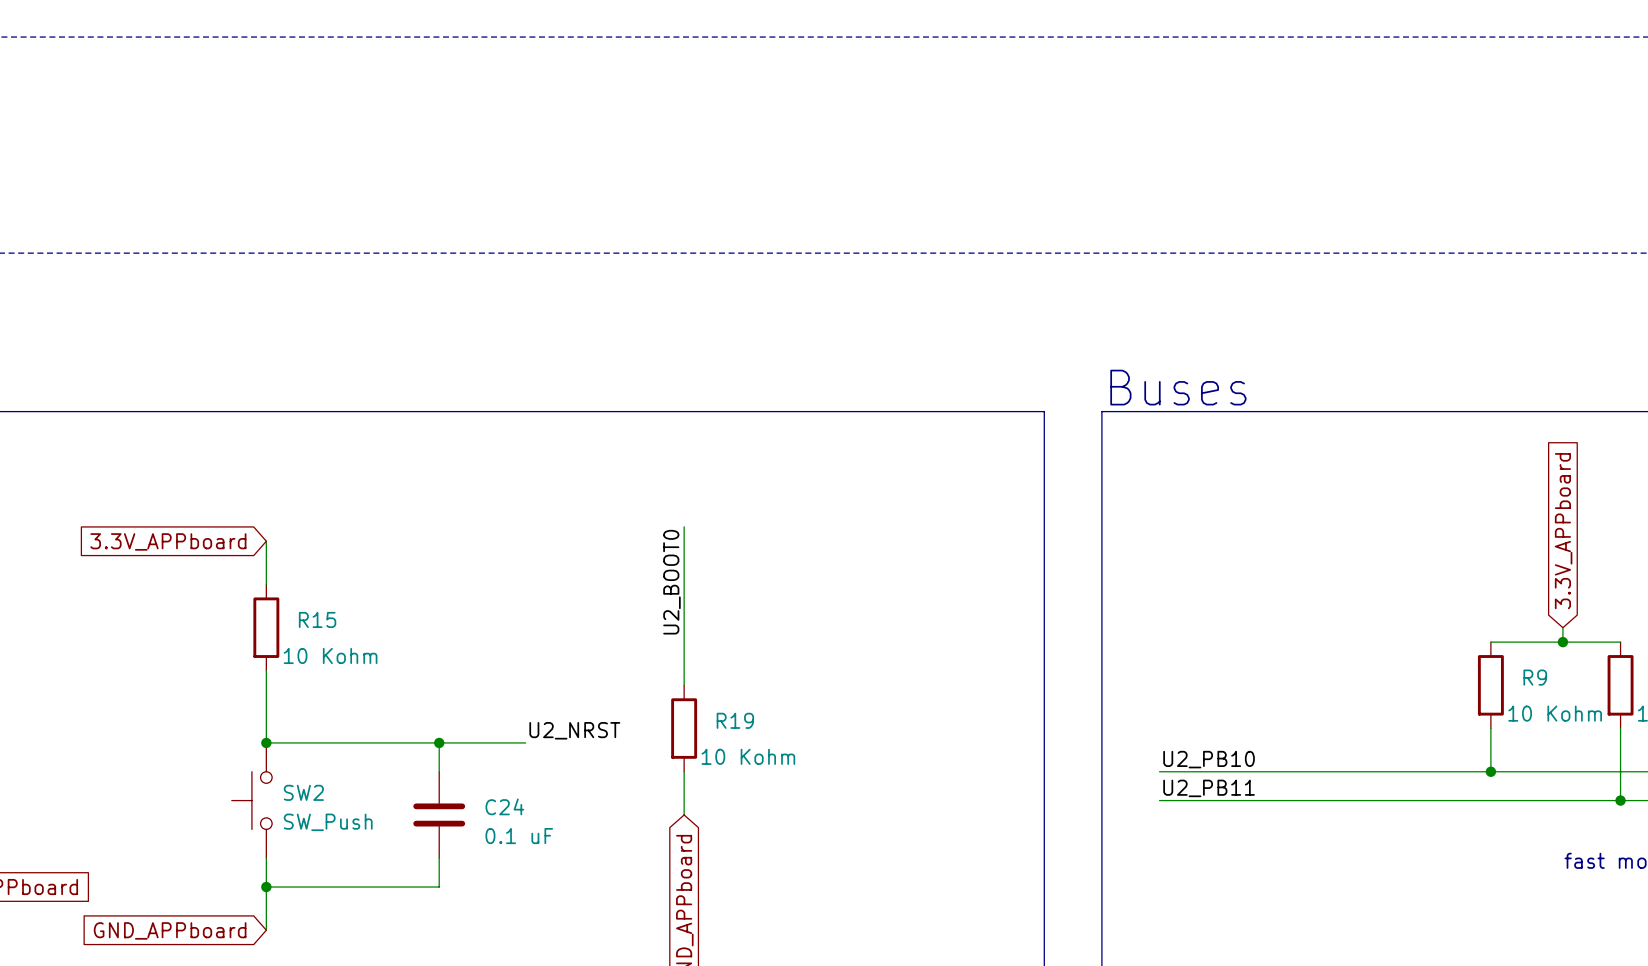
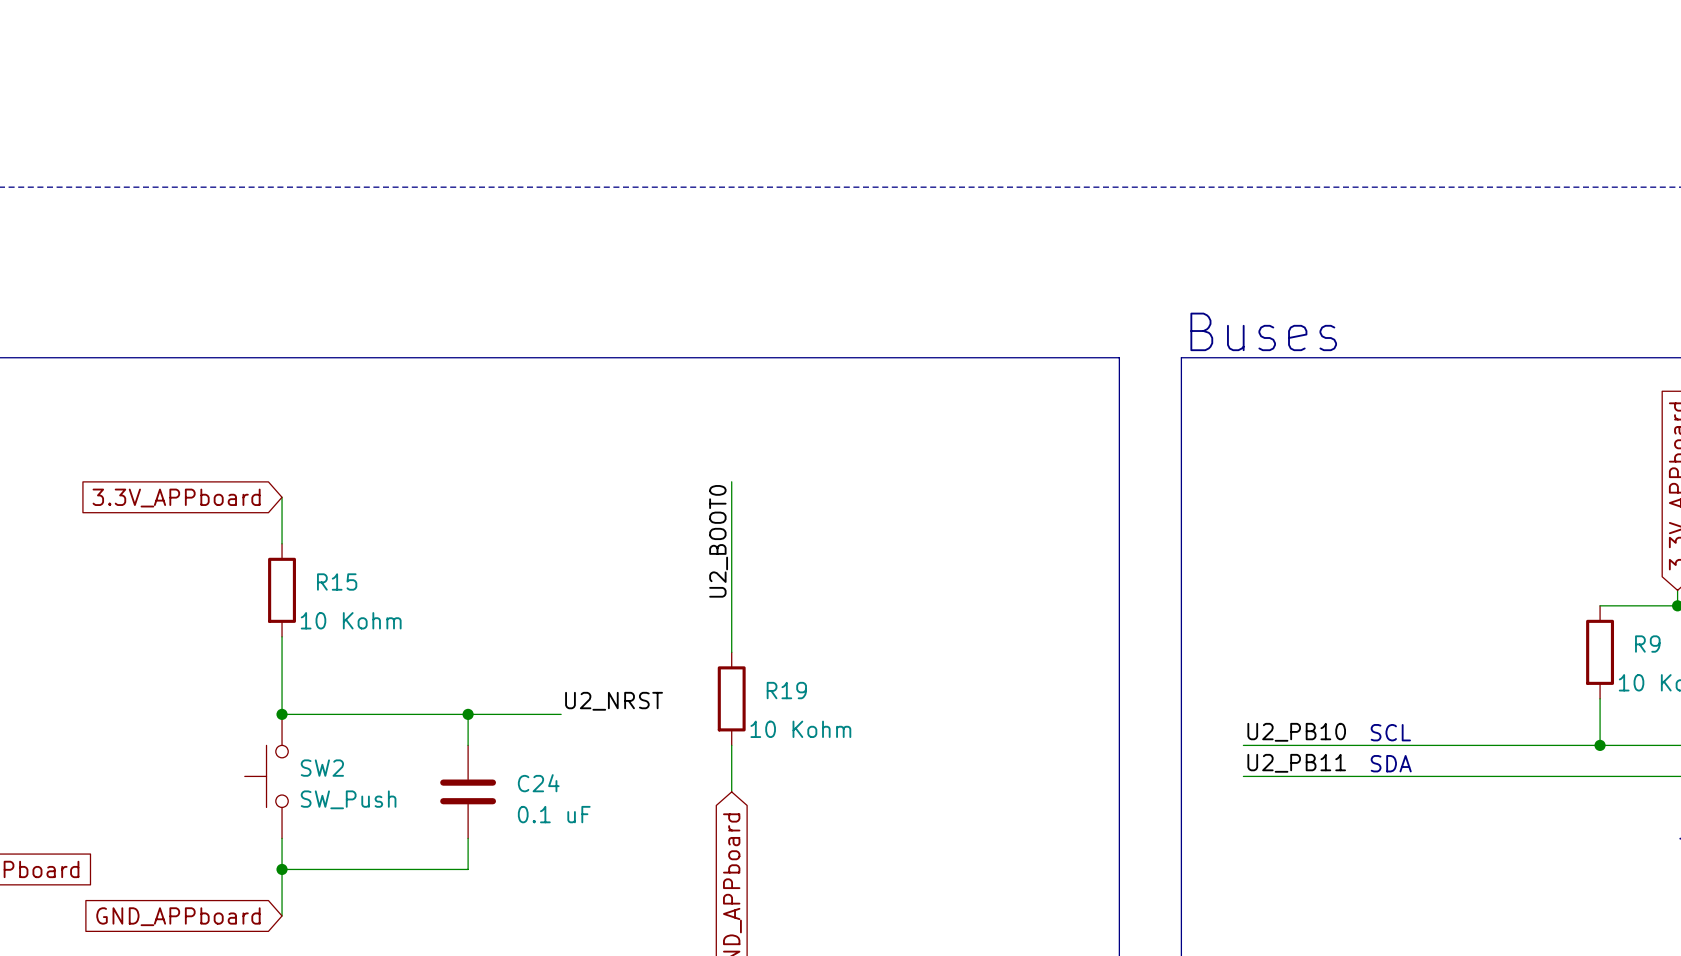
text: none -> SCL (1390, 732)
text: none -> SDA (1391, 763)

